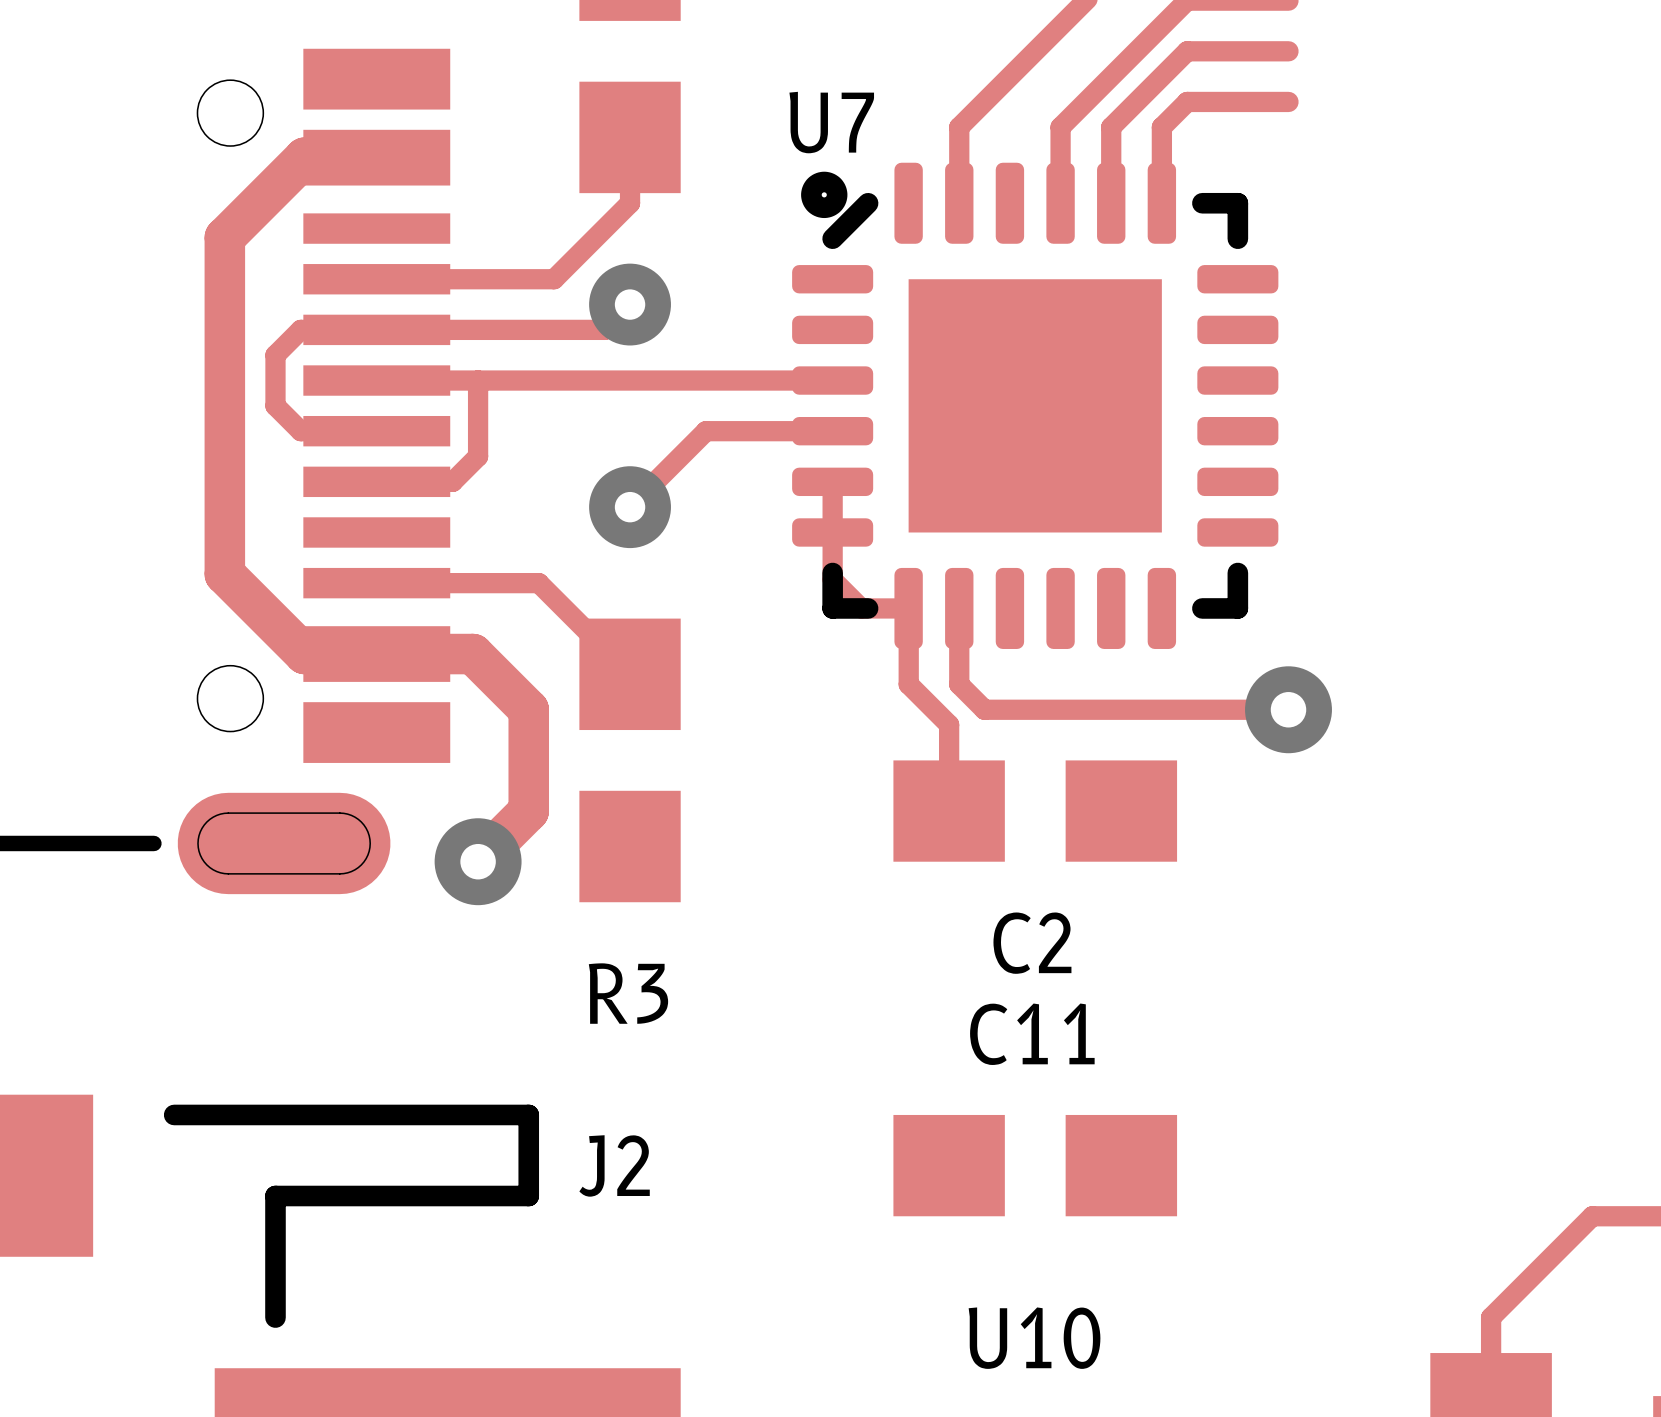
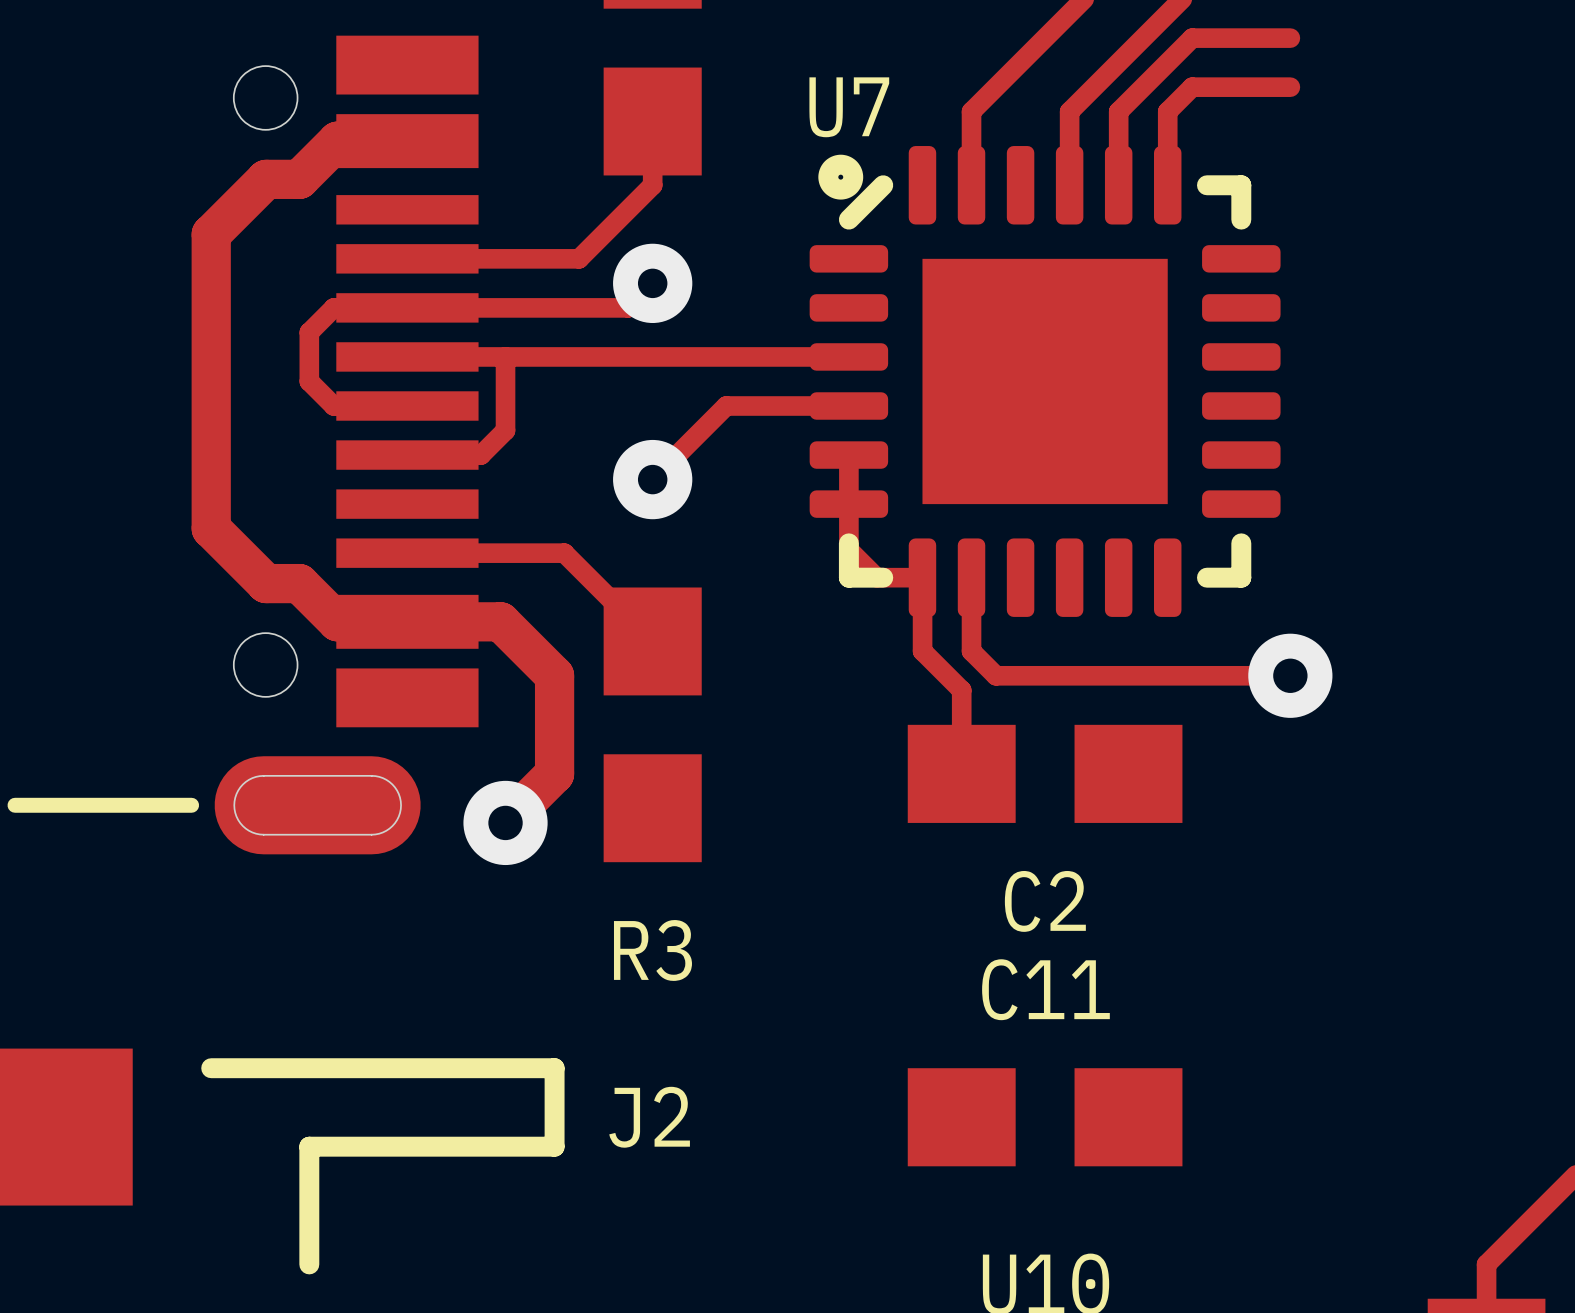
track: (265, 197) (224, 237) (224, 574) (265, 614) -> (299, 179) (266, 179) (211, 234) (211, 528) (266, 583) (299, 583)

